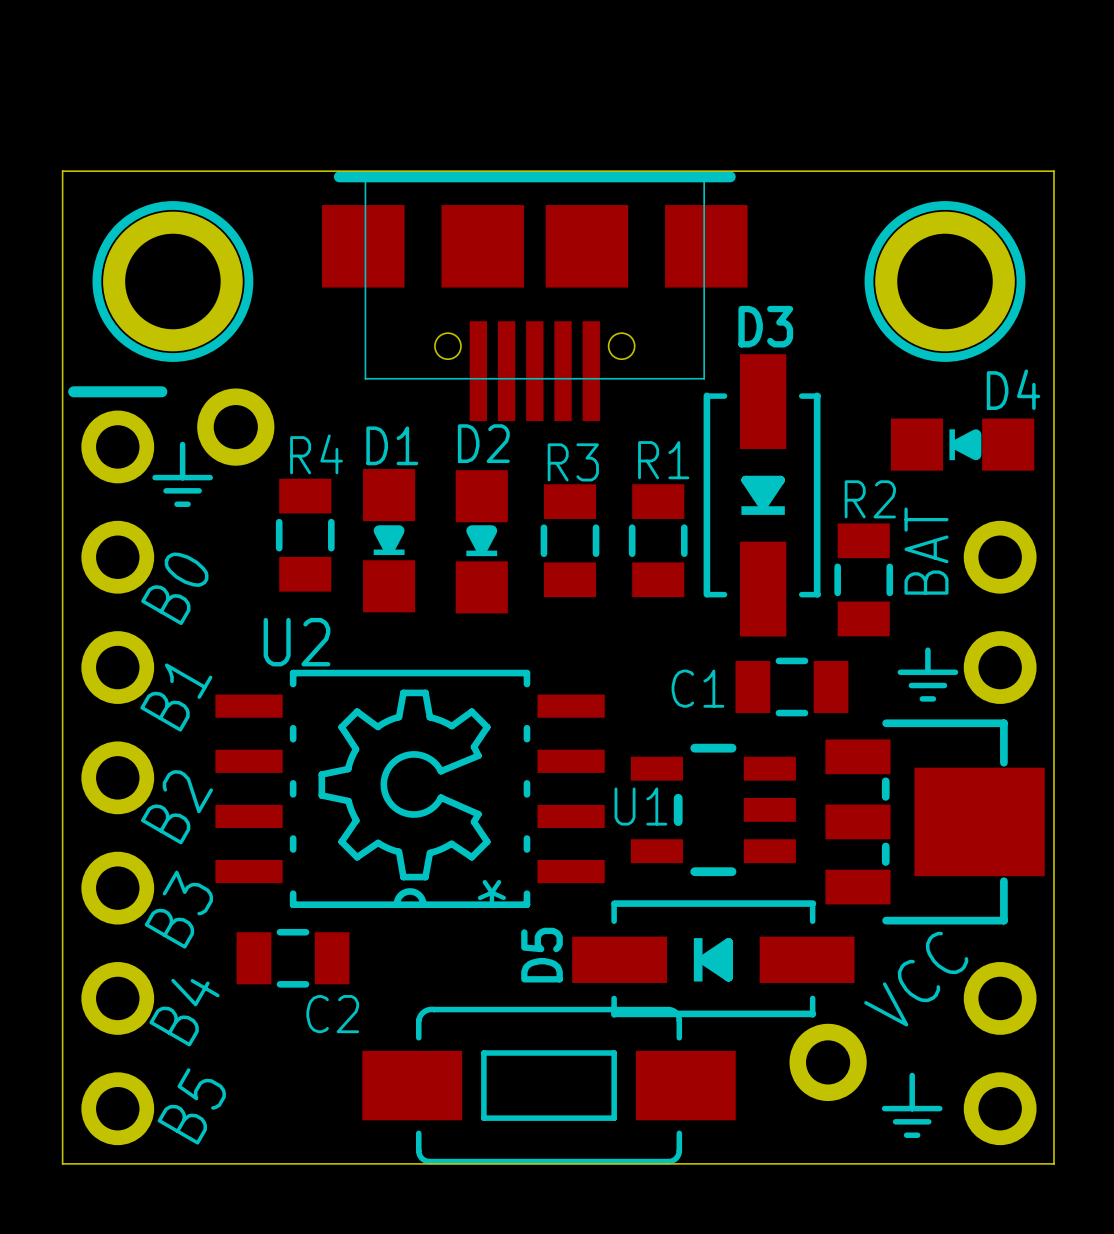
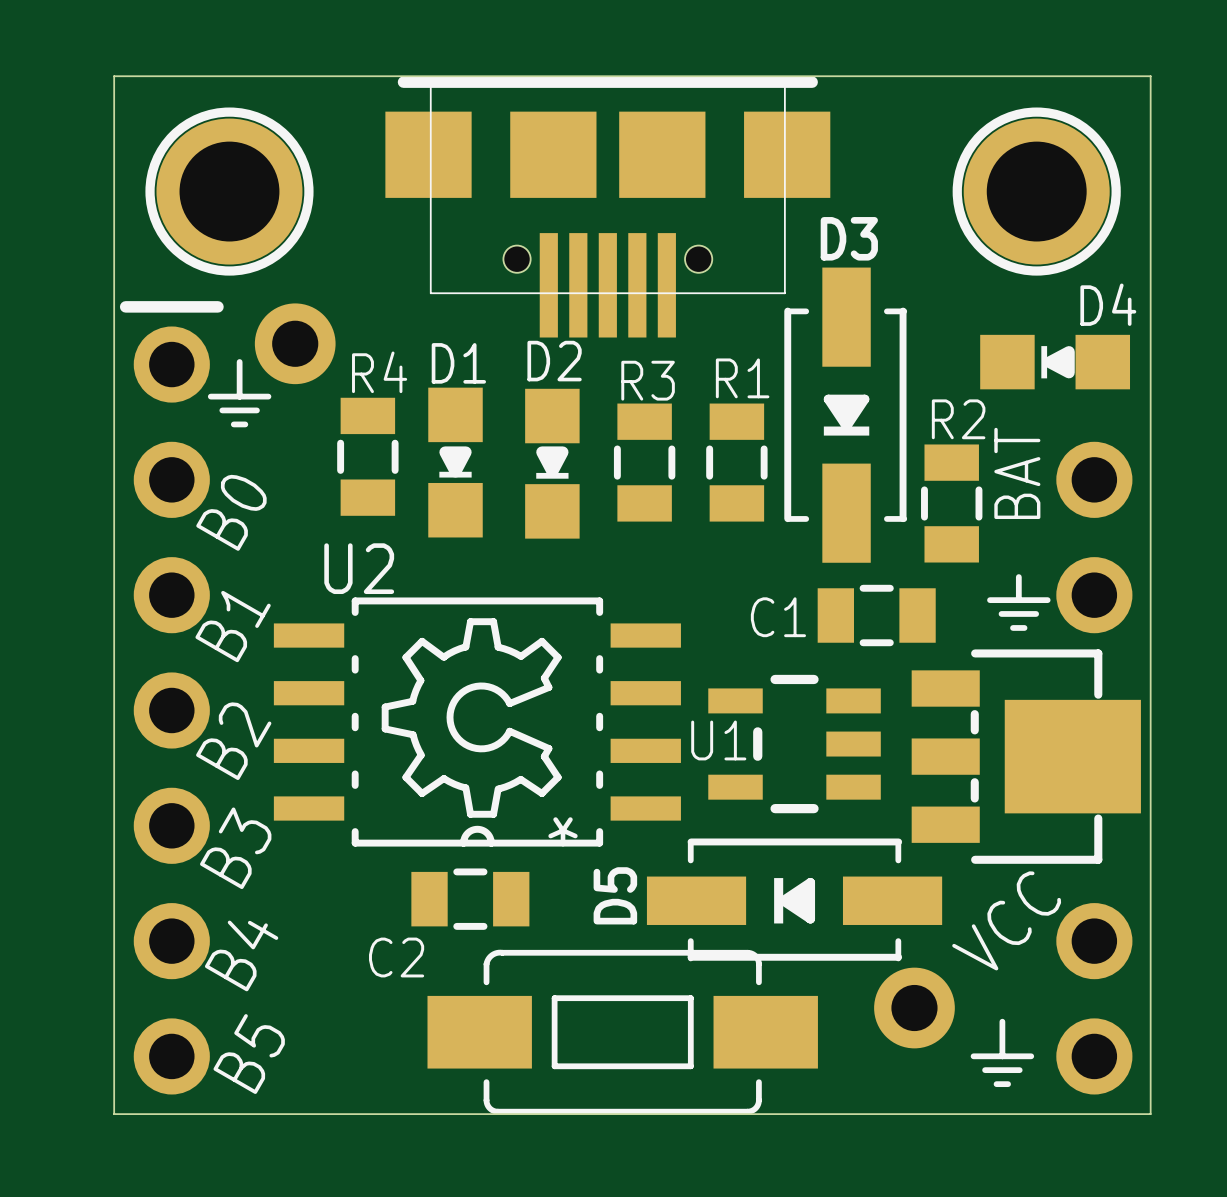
C2 position: (293, 958) -> (470, 899)

